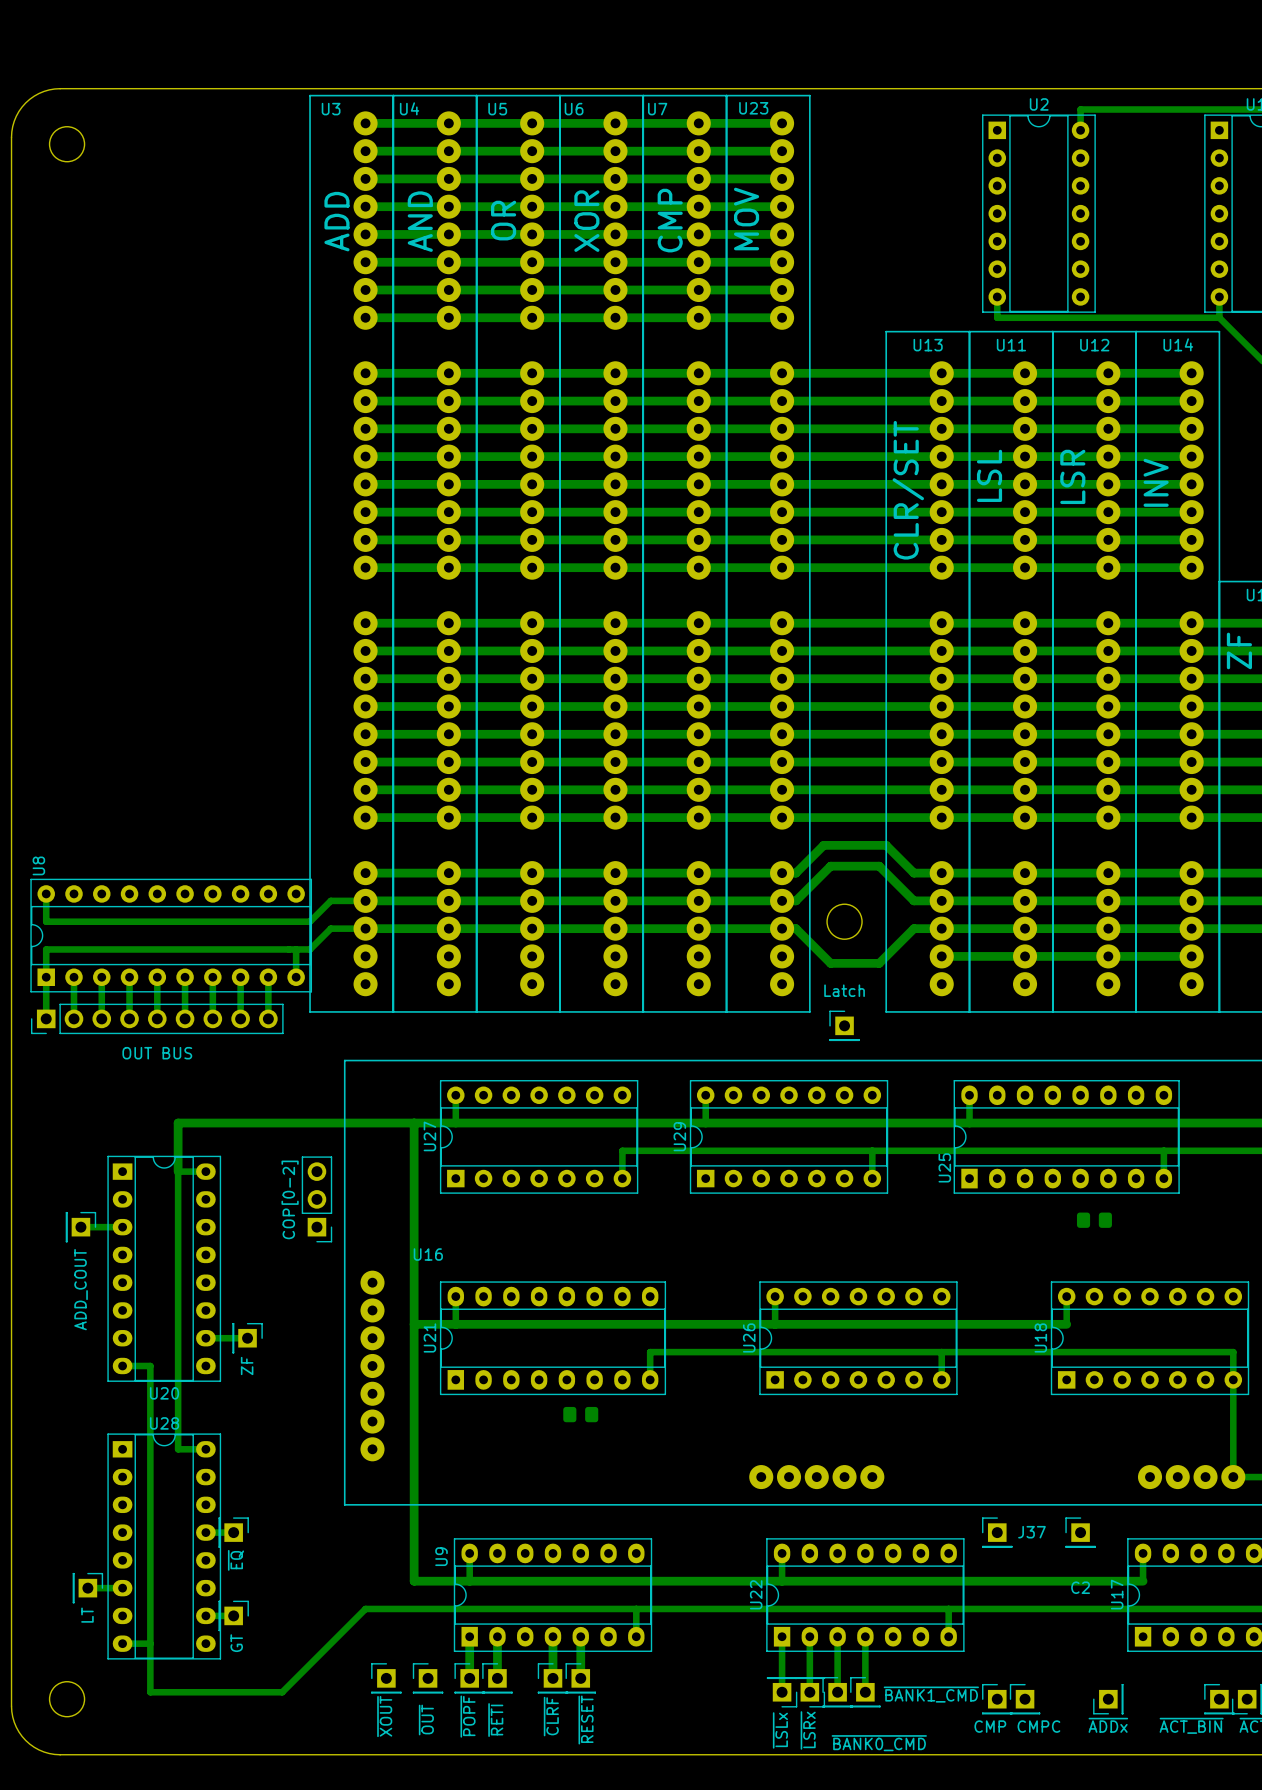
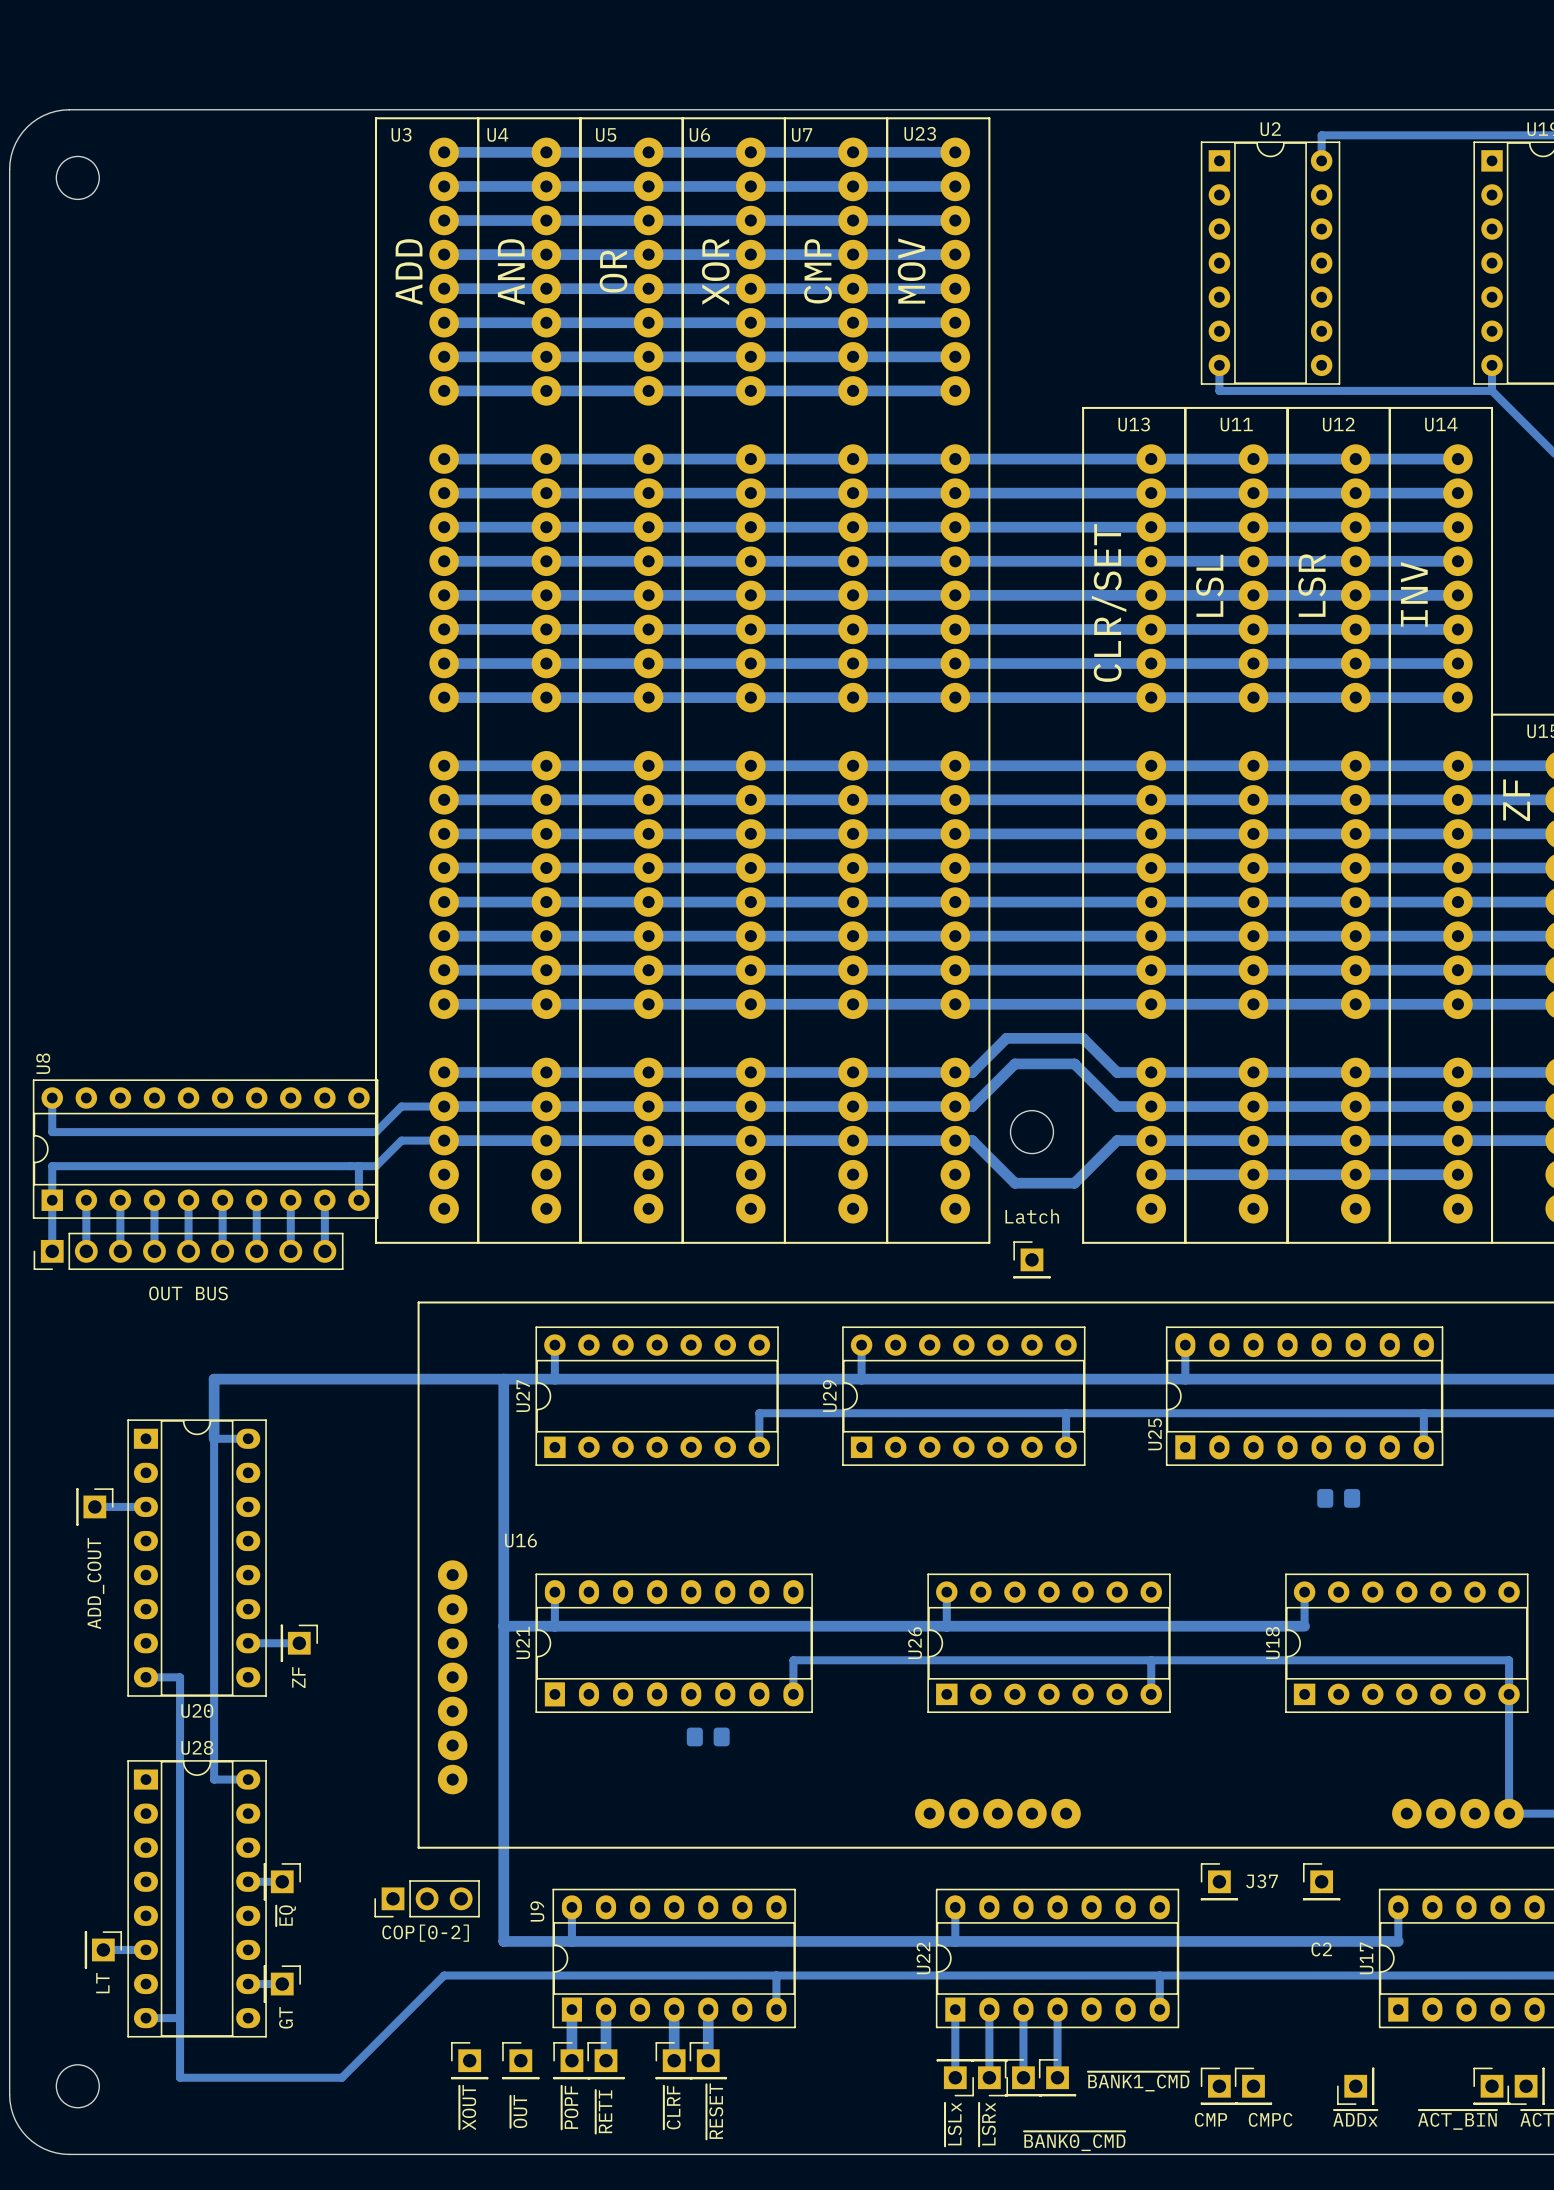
text: COP[0-2] (290, 1199) -> none
part: (316, 1199) -> none
part: none -> (427, 1898)
text: none -> COP[0-2] (425, 1933)

